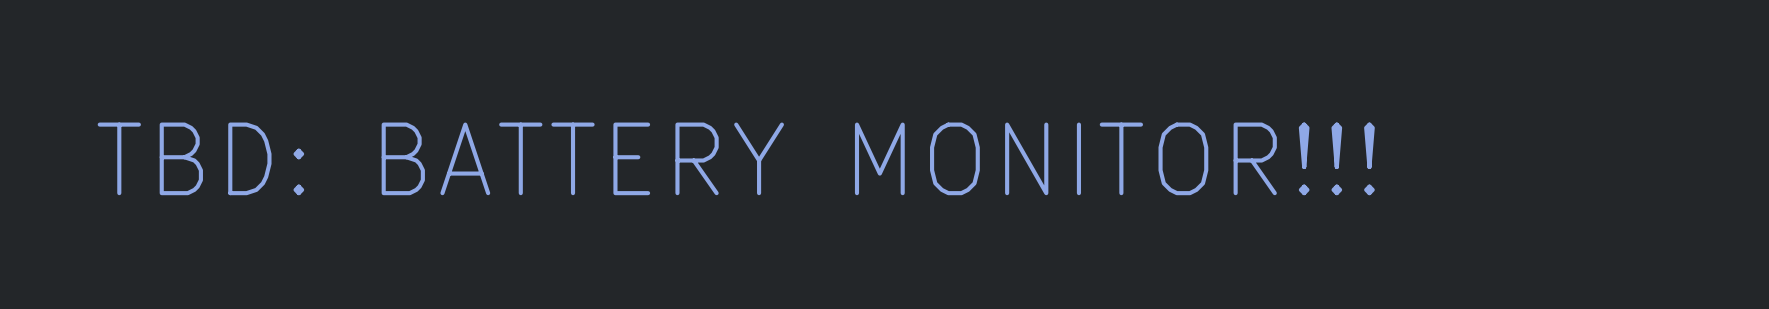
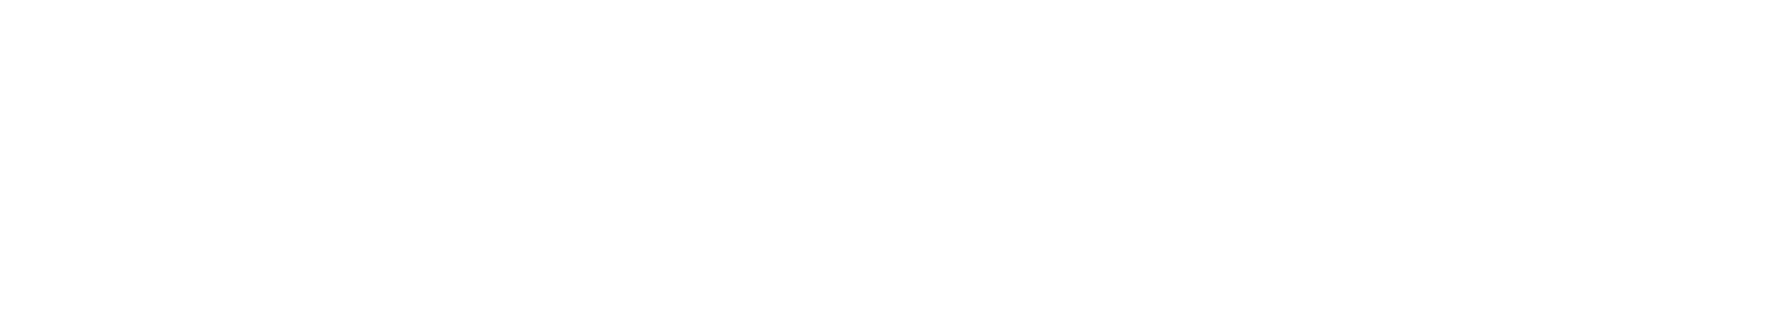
text: TBD: BATTERY MONITOR!!! (736, 158) -> none

